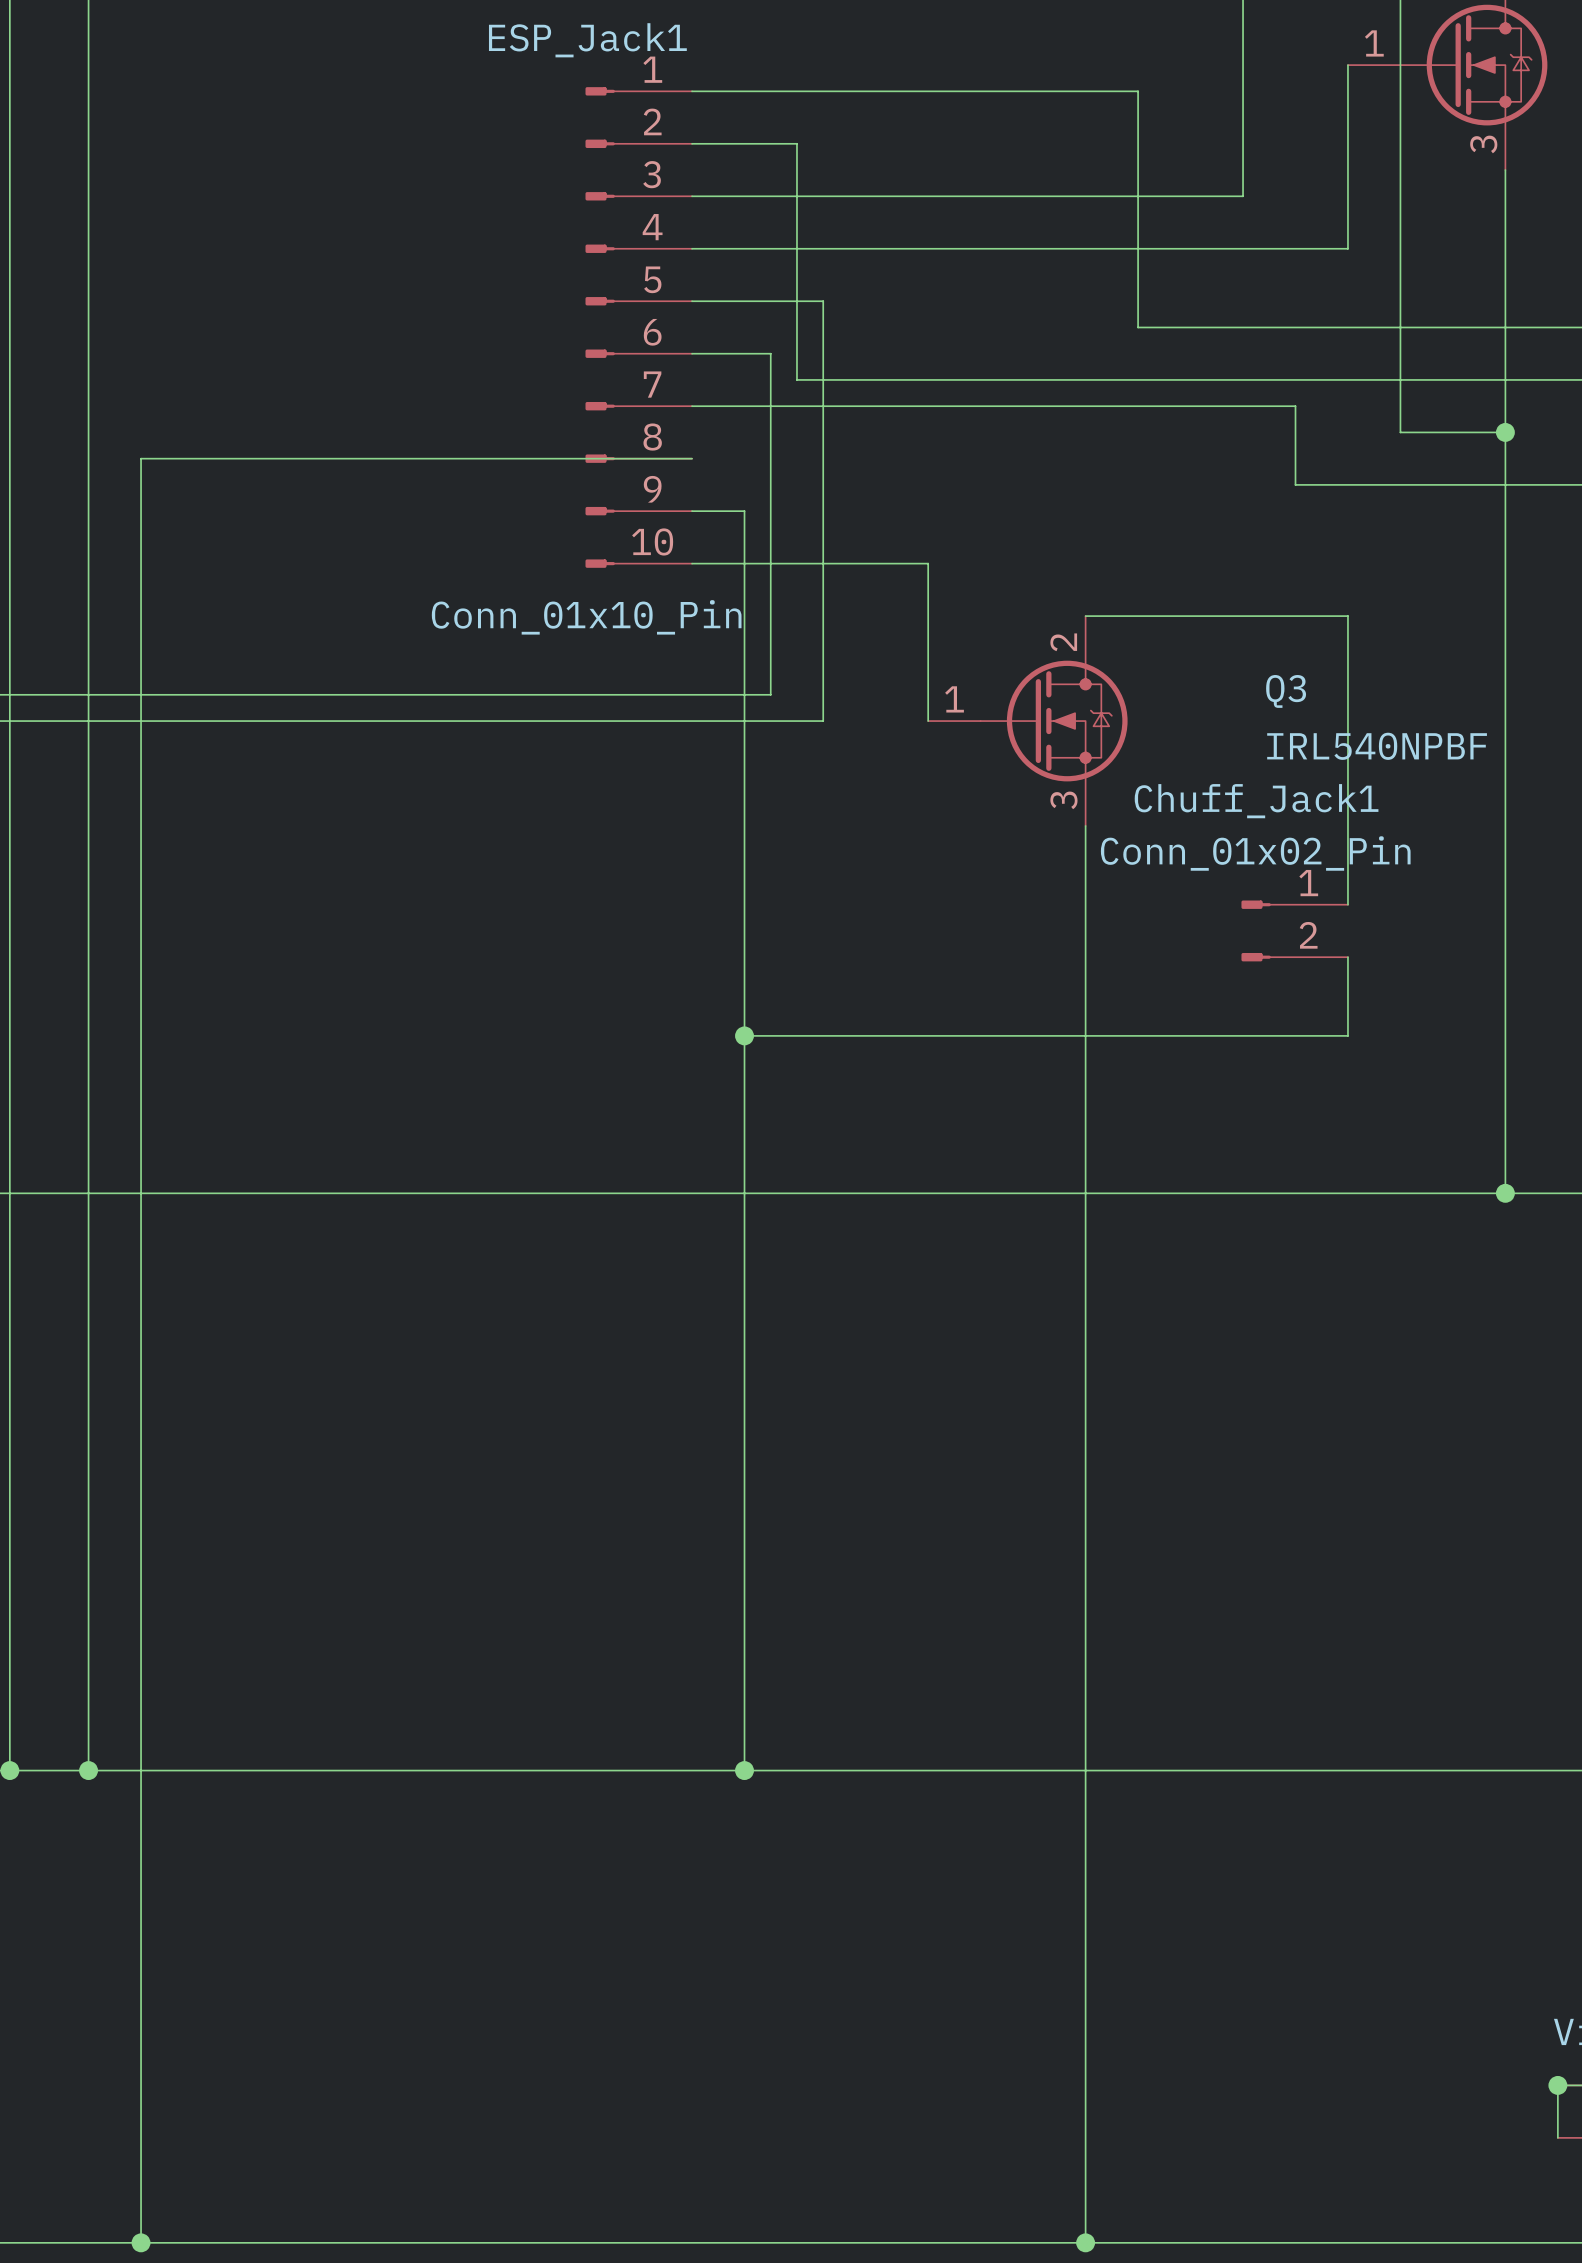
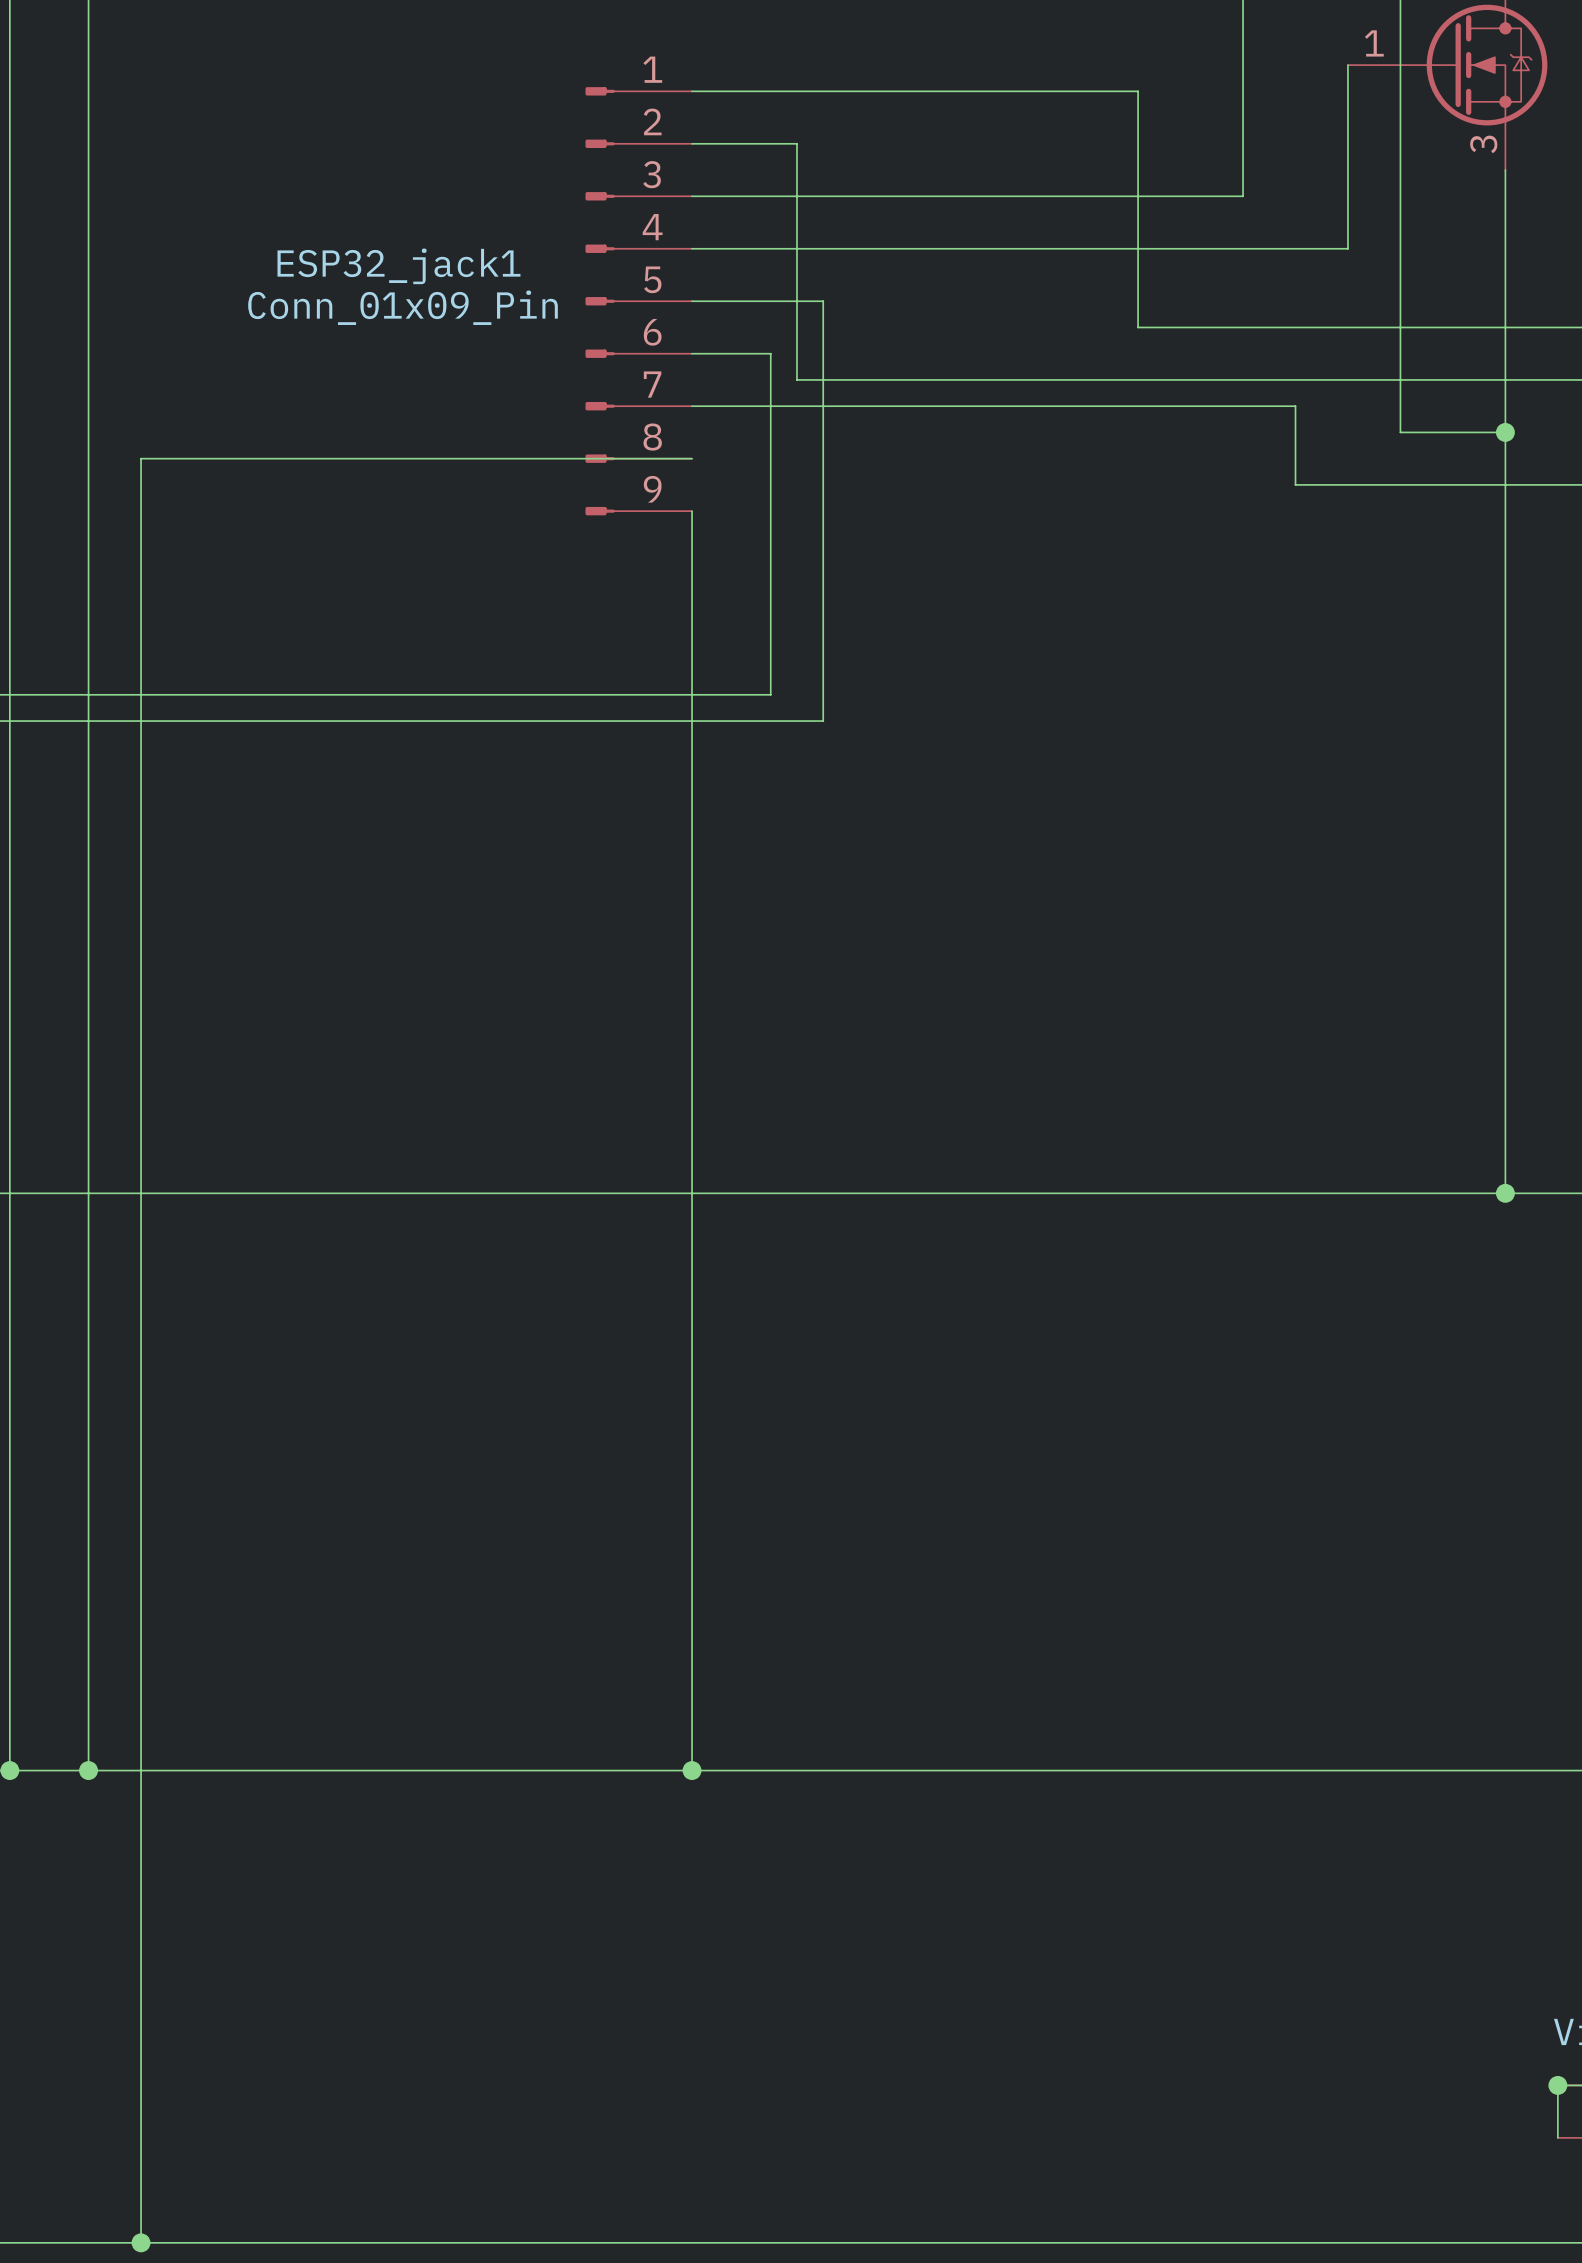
ESP32_jack1: none -> Conn_01x09_Pin (638, 301)
ESP_Jack1: Conn_01x10_Pin (638, 327) -> none
wire: (692, 511) (744, 511) (744, 1770) -> (692, 511) (692, 1770)
wire: (692, 563) (928, 563) (928, 721) -> none
wire: (1085, 616) (1347, 616) (1347, 904) -> none
Q3: IRL540NPBF (1027, 721) -> none
wire: (1085, 826) (1085, 2242) -> none
Chuff_Jack1: Conn_01x02_Pin (1294, 930) -> none
wire: (1347, 957) (1347, 1035) (744, 1035) -> none
junction: (744, 1035) -> none
junction position: (744, 1770) -> (692, 1770)
junction: (1085, 2242) -> none

